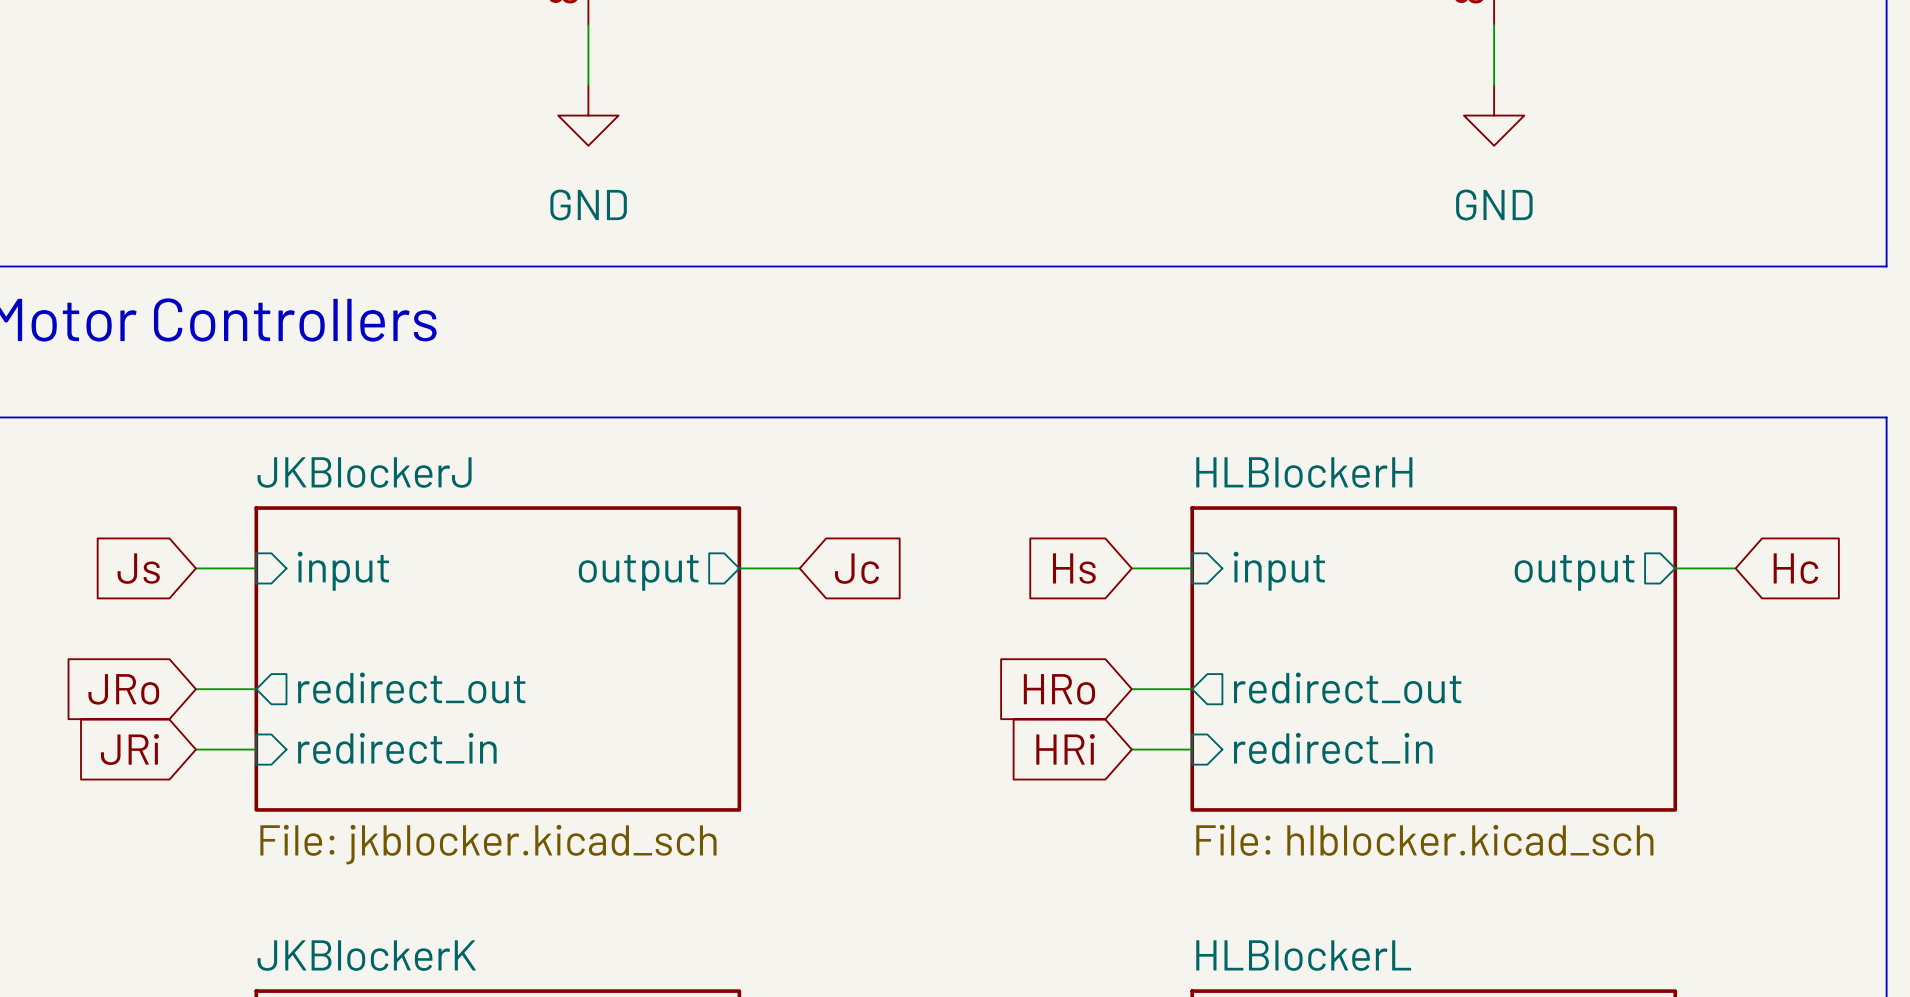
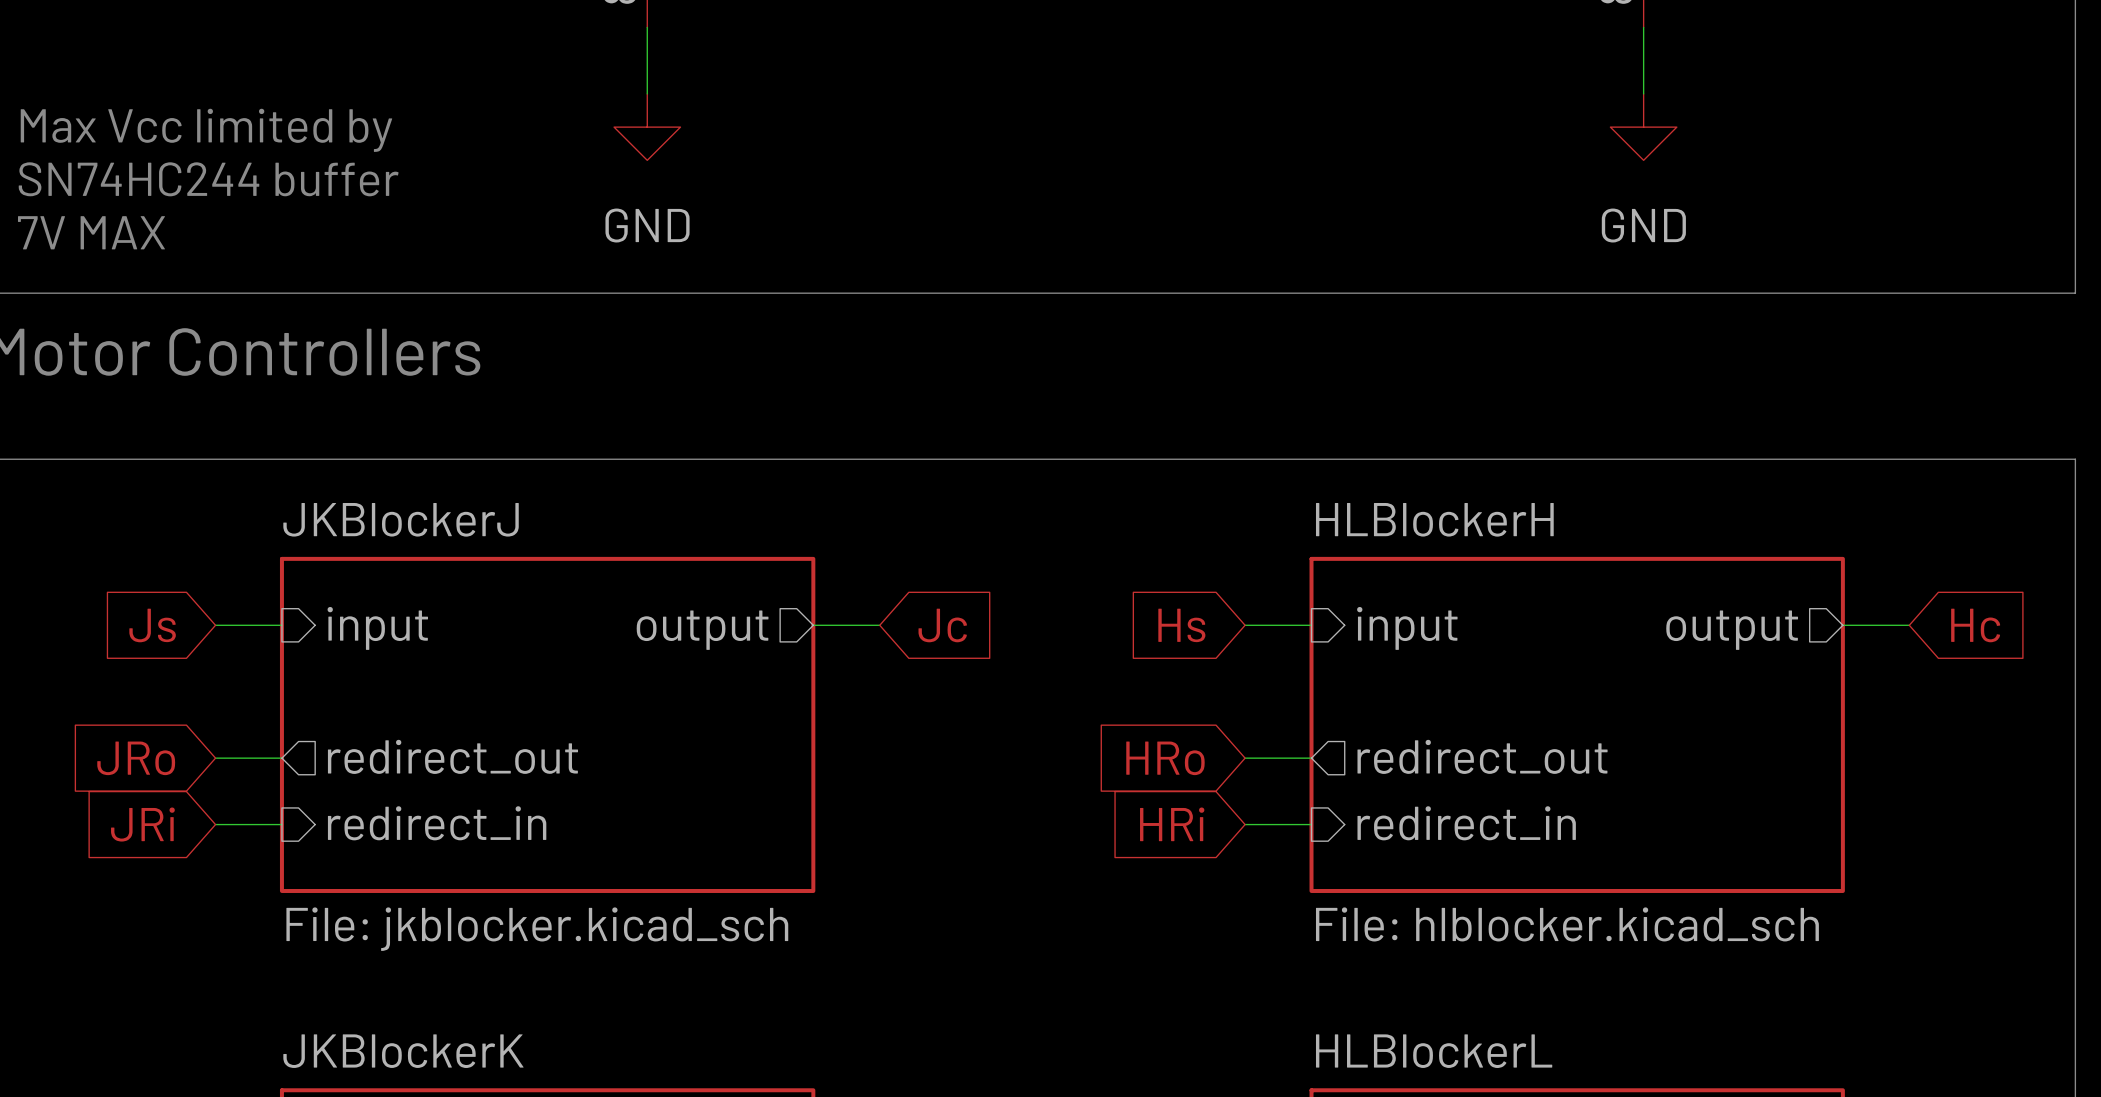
text: none -> Max Vcc limited by (206, 130)
text: none -> SN74HC244 buffer (208, 179)
text: none -> 7V MAX (91, 232)

